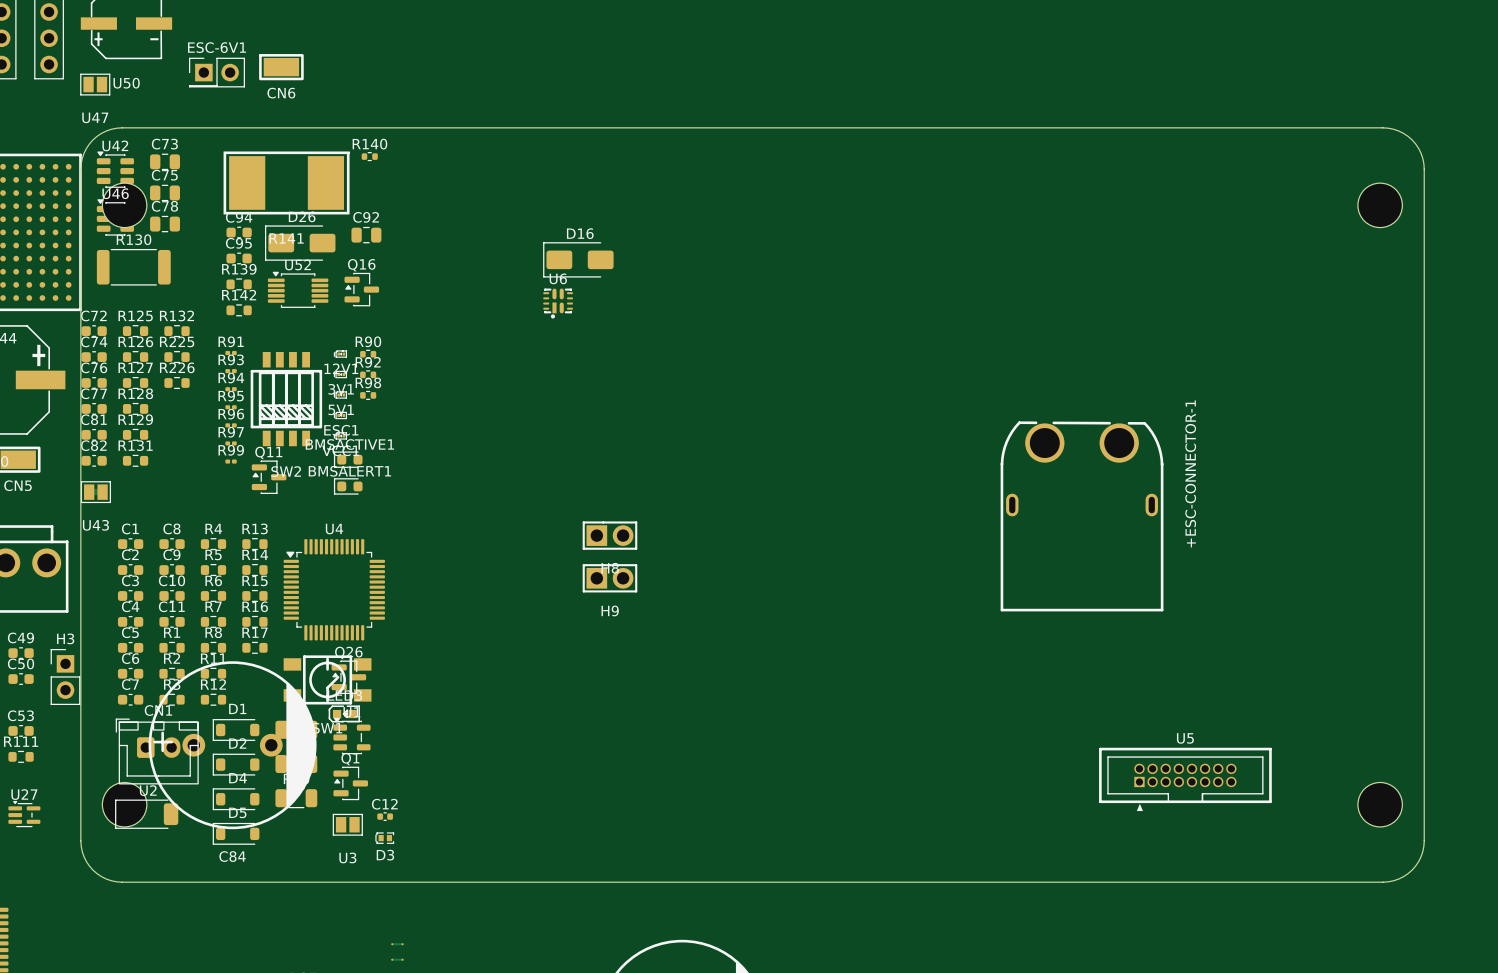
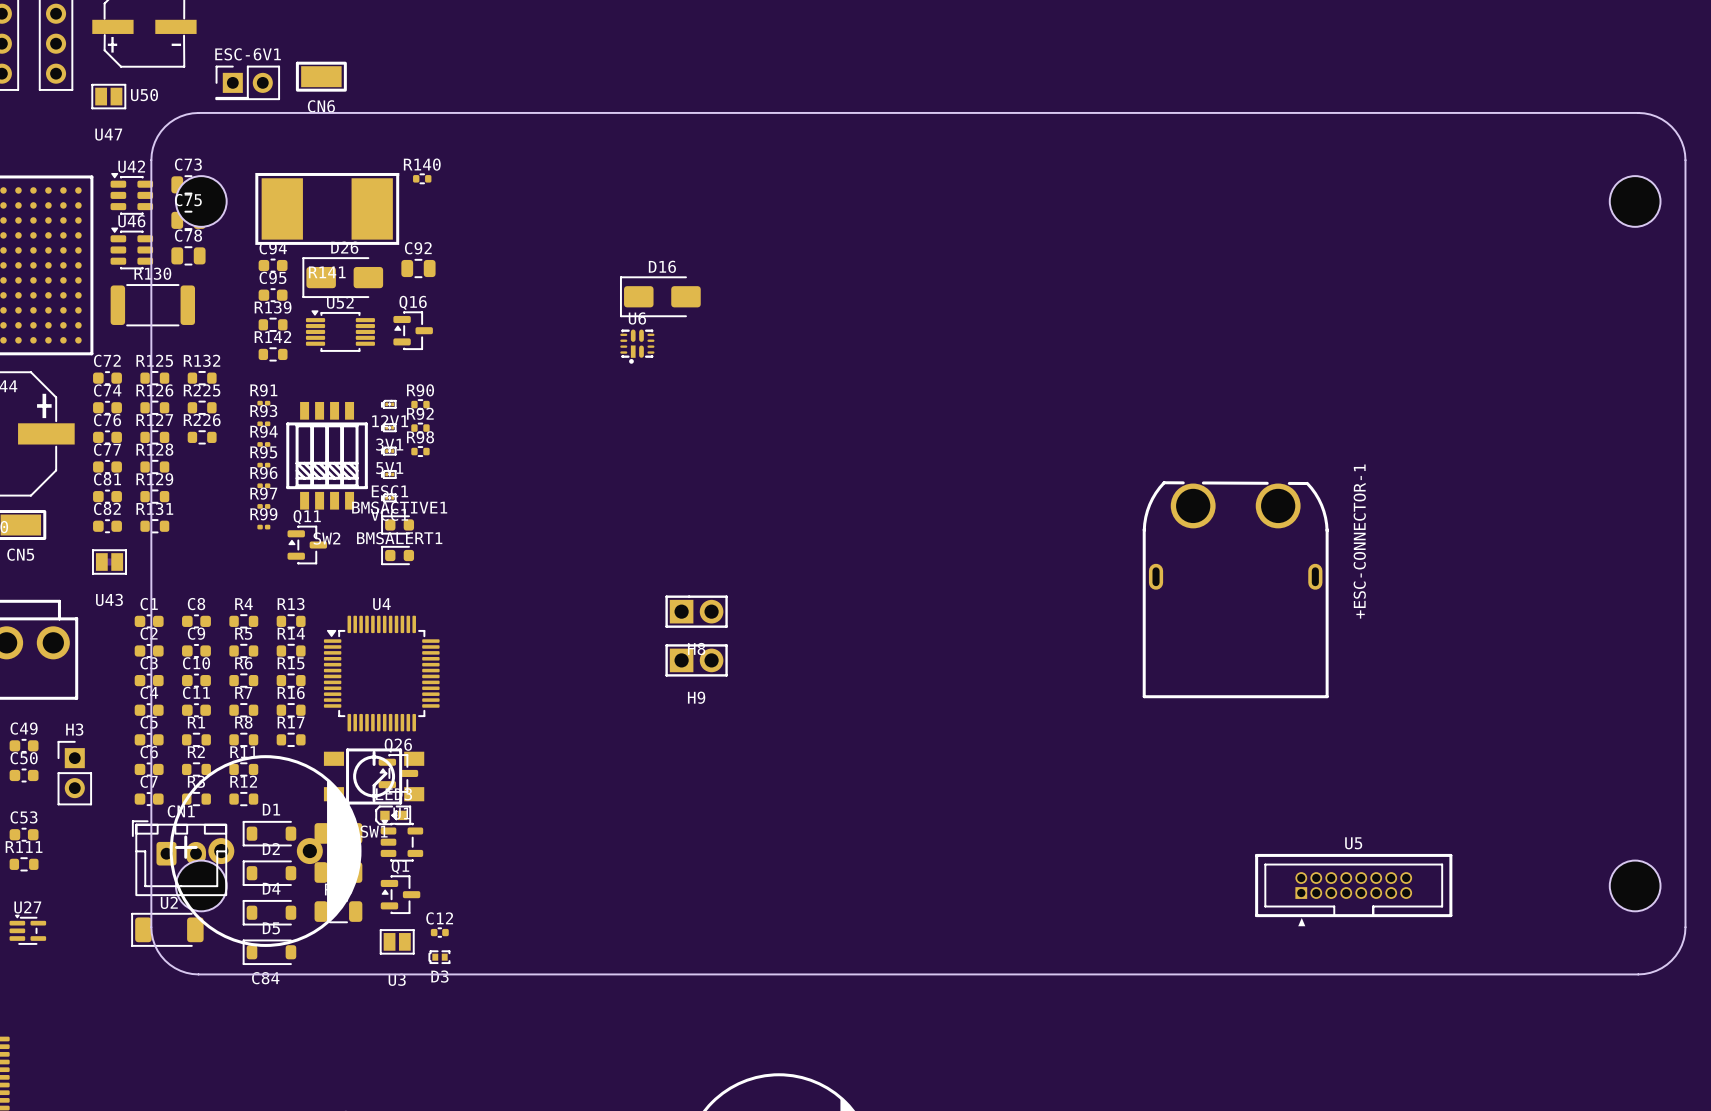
part position: (752, 505) -> (918, 543)
part: (397, 944) -> none
part: (397, 959) -> none

